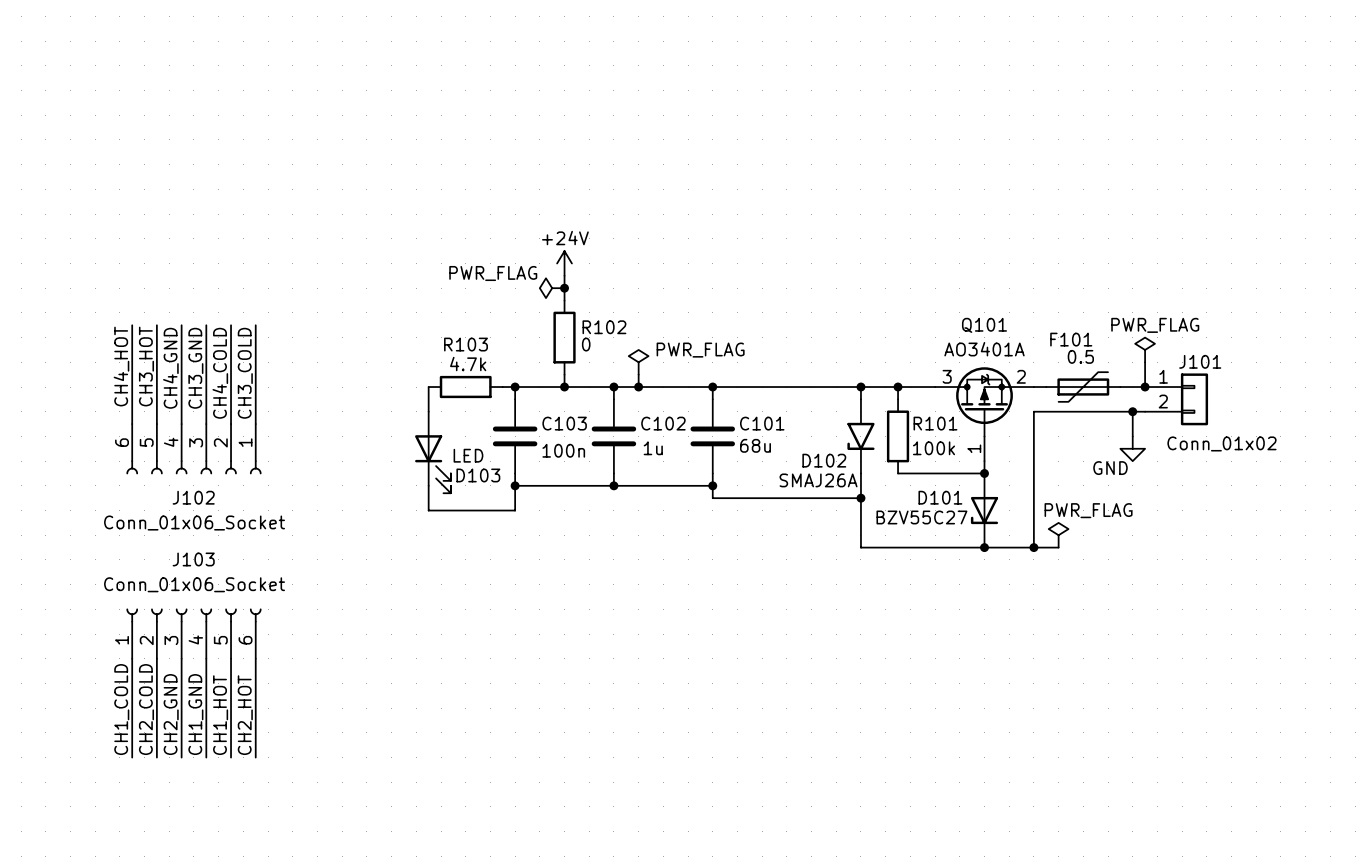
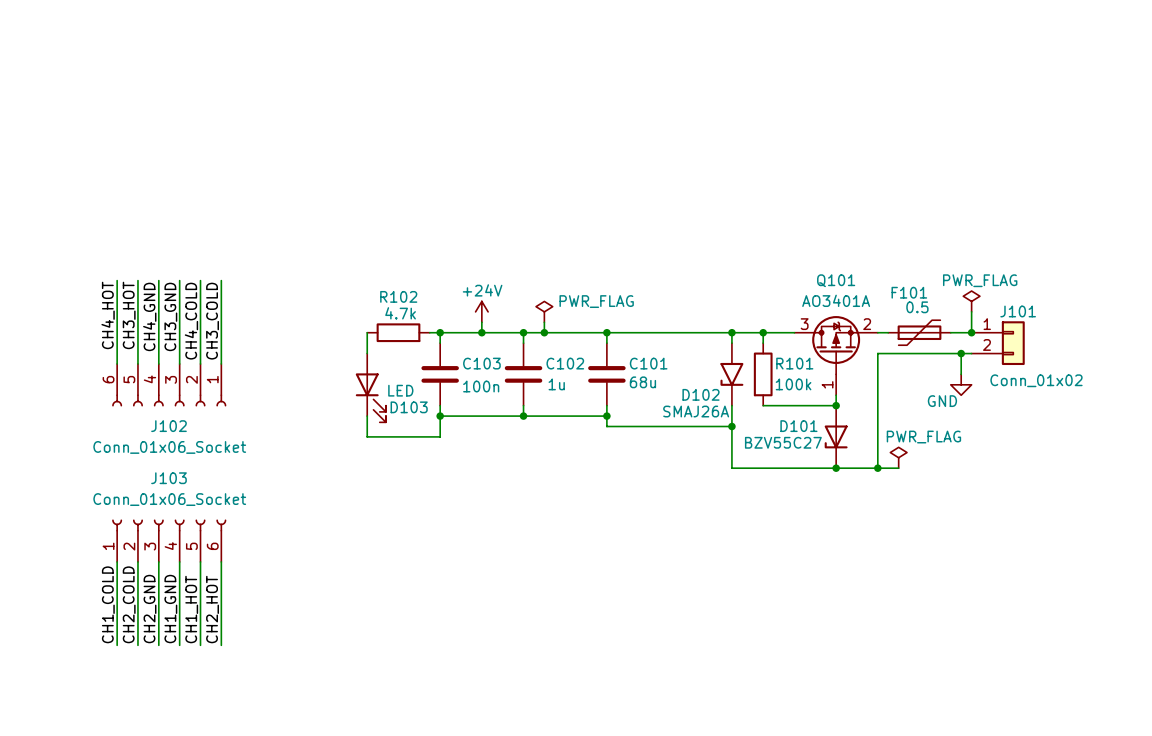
power symbol position: +24V (564, 263) -> +24V (481, 311)
wire: (564, 275) (564, 300) -> none
power symbol: PWR_FLAG (552, 288) -> none
junction: (564, 288) -> none
R102: 0 (564, 337) -> none
R103 name: R103 (466, 344) -> R102 (398, 296)

